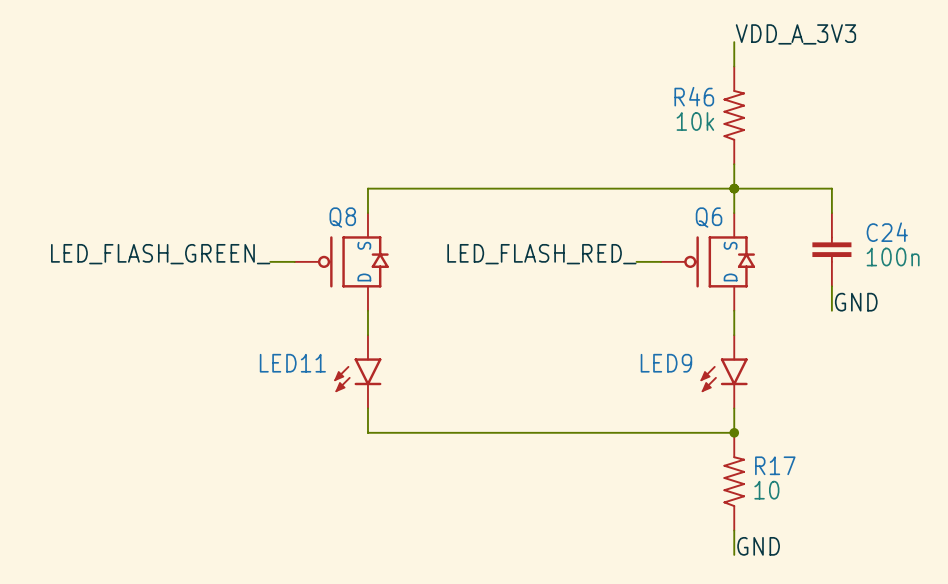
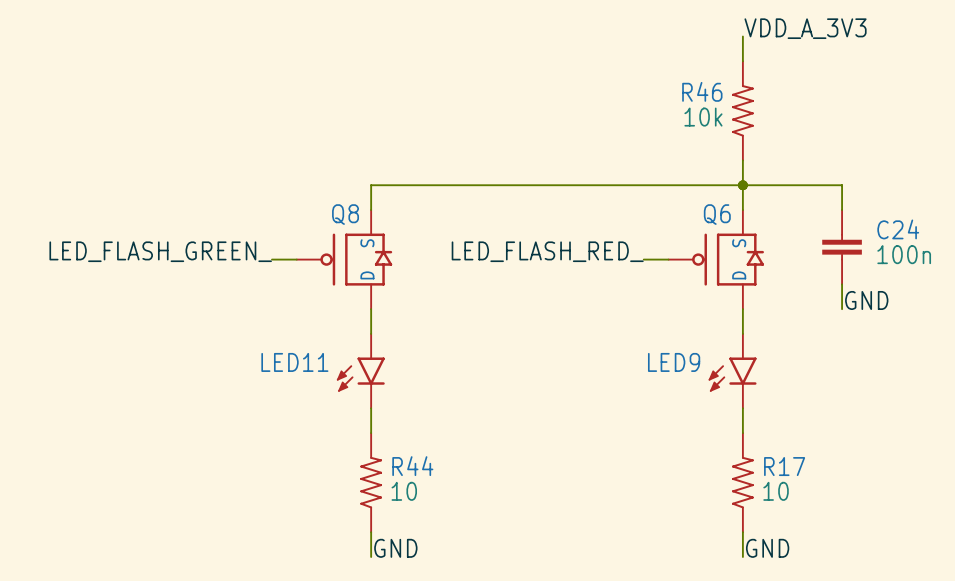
wire: (367, 432) (734, 432) -> none
junction: (734, 432) -> none
R44: none -> 10 (371, 482)
wire: none -> (371, 532) (371, 557)
label: none -> GND (395, 548)

